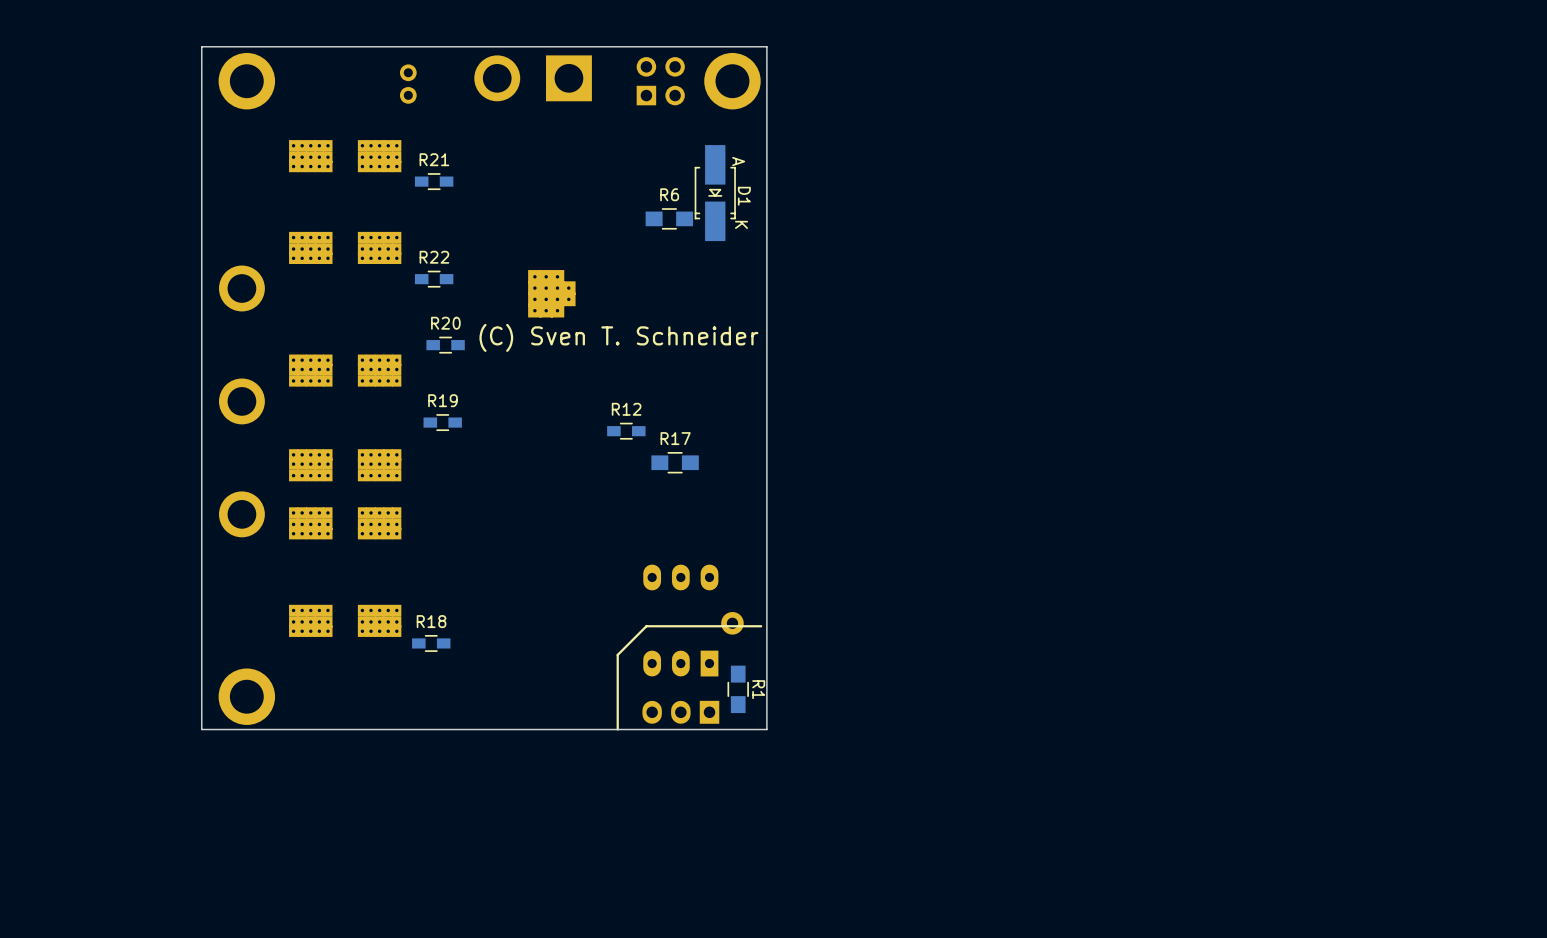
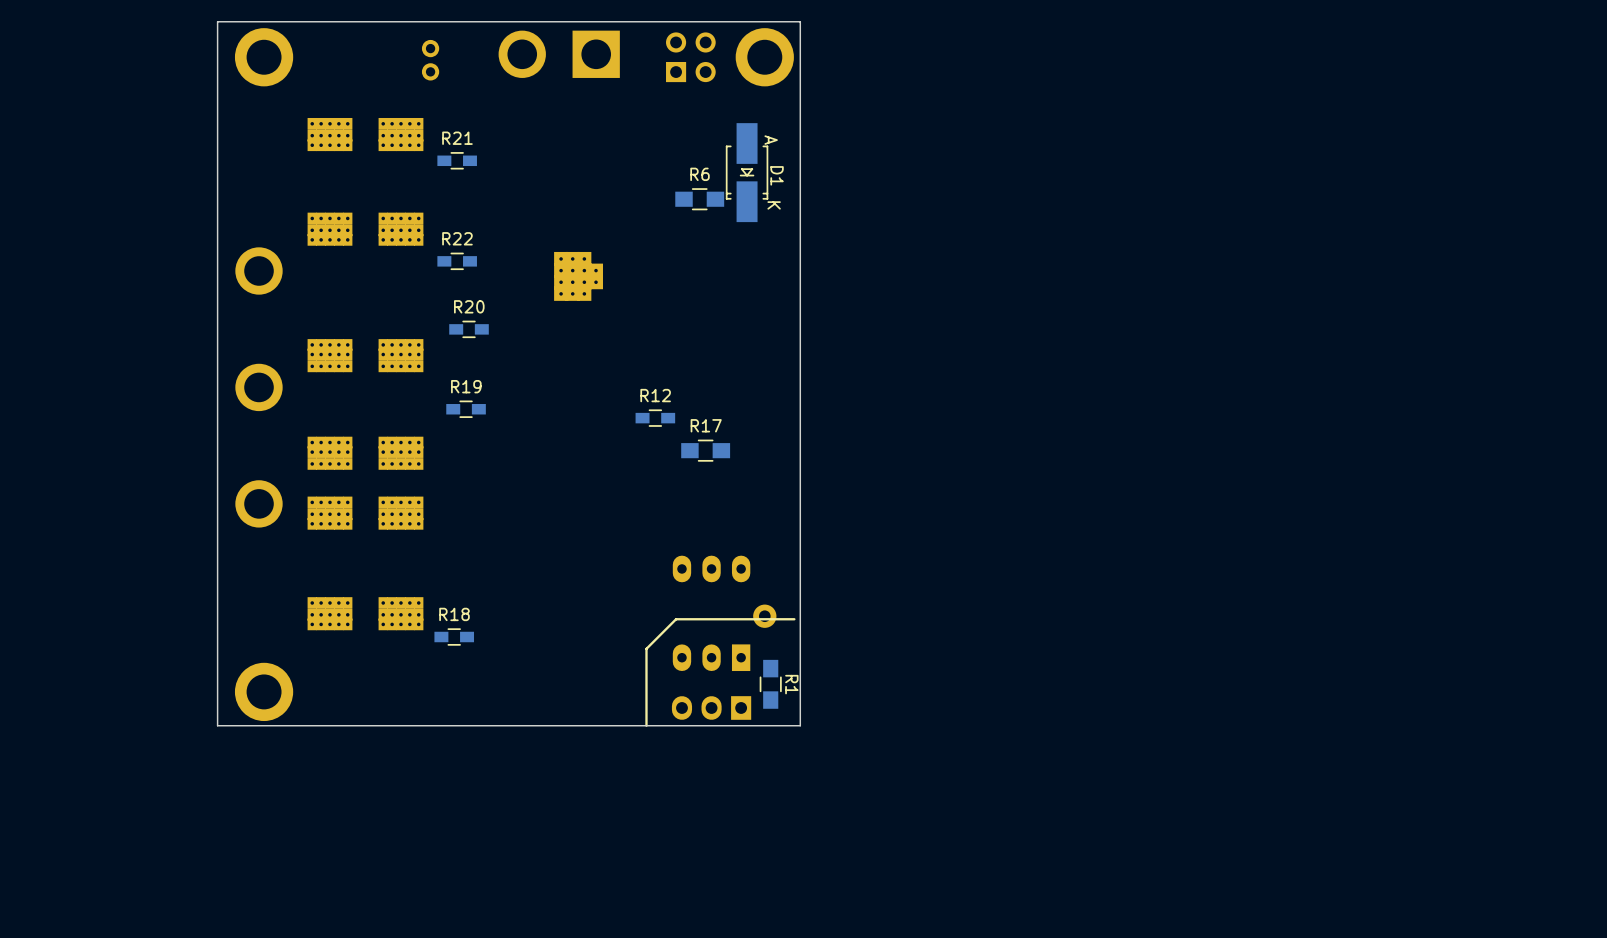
text: (C) Sven T. Schneider (618, 337) -> none

